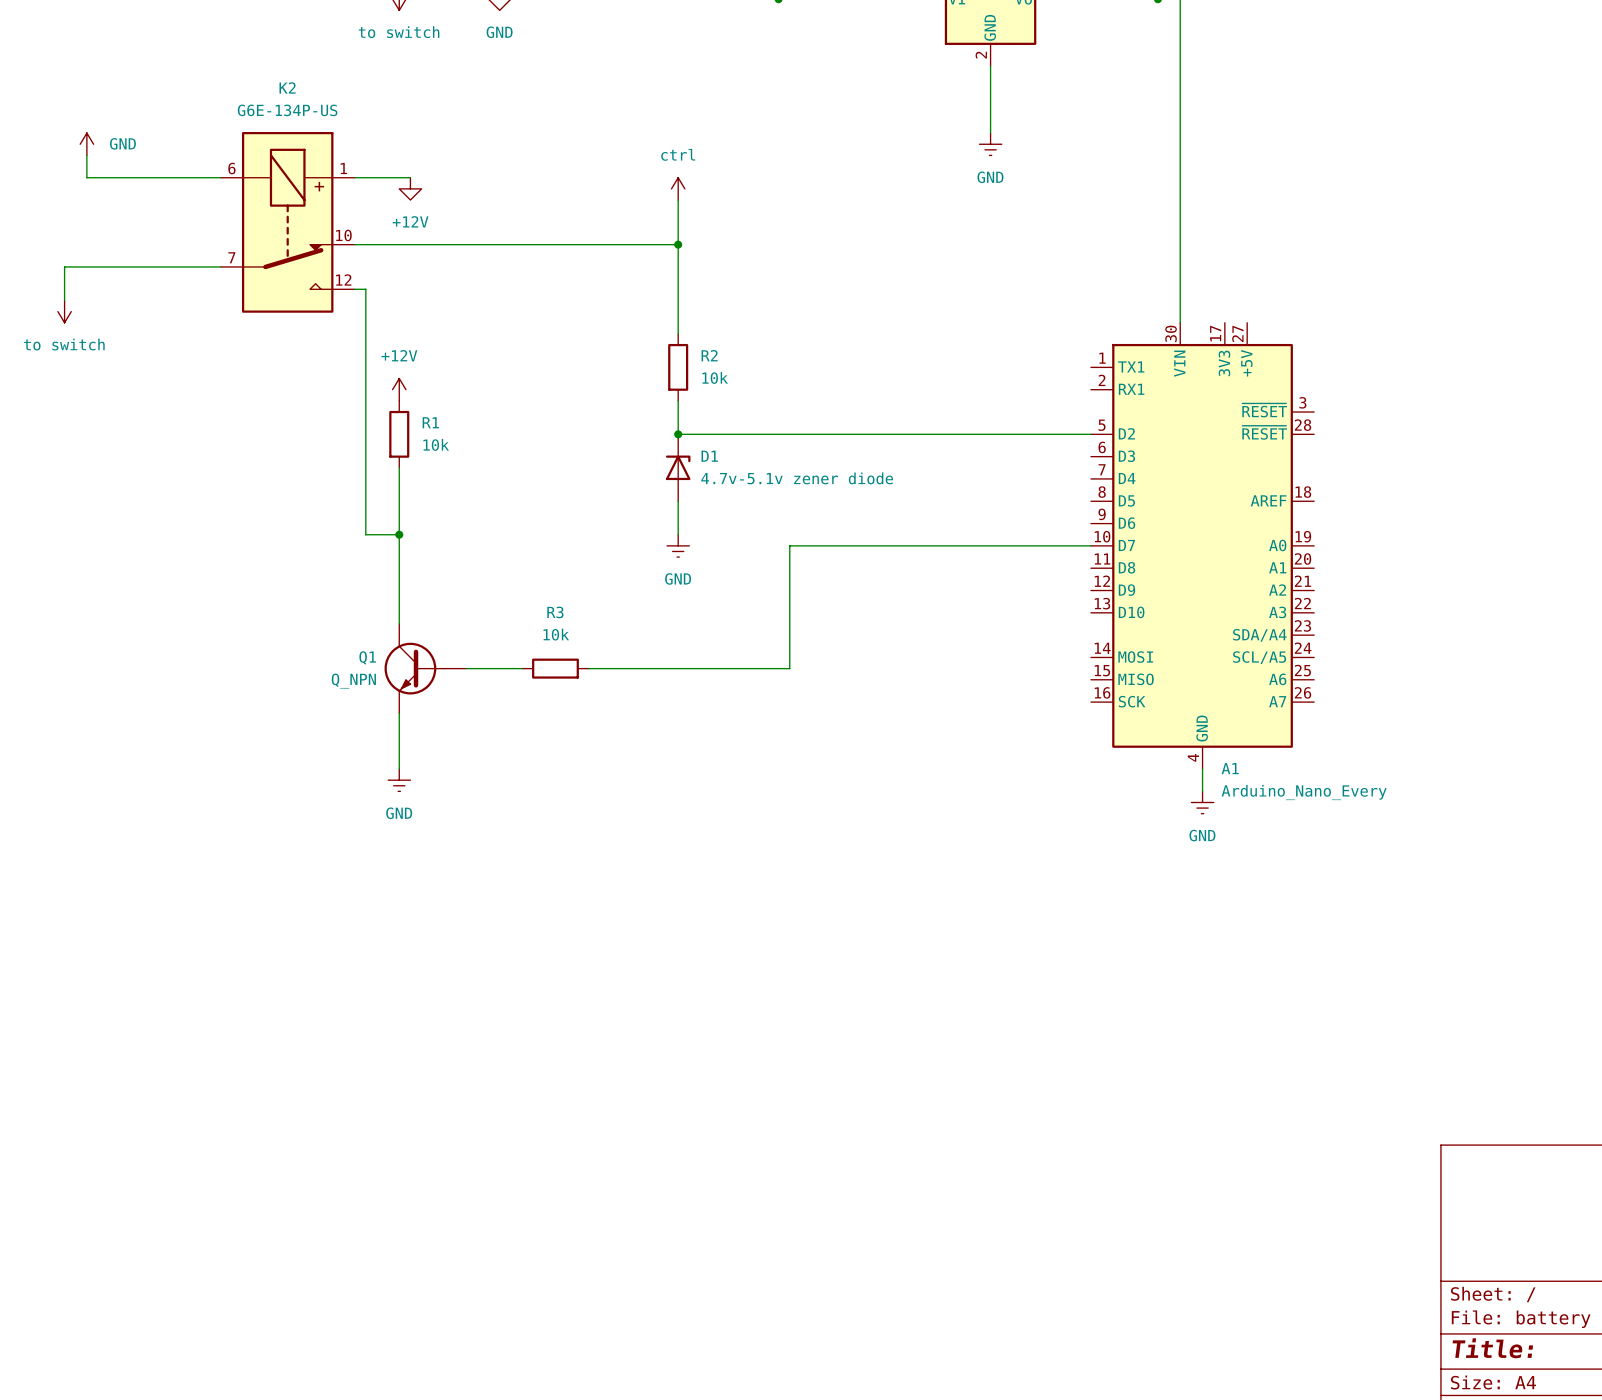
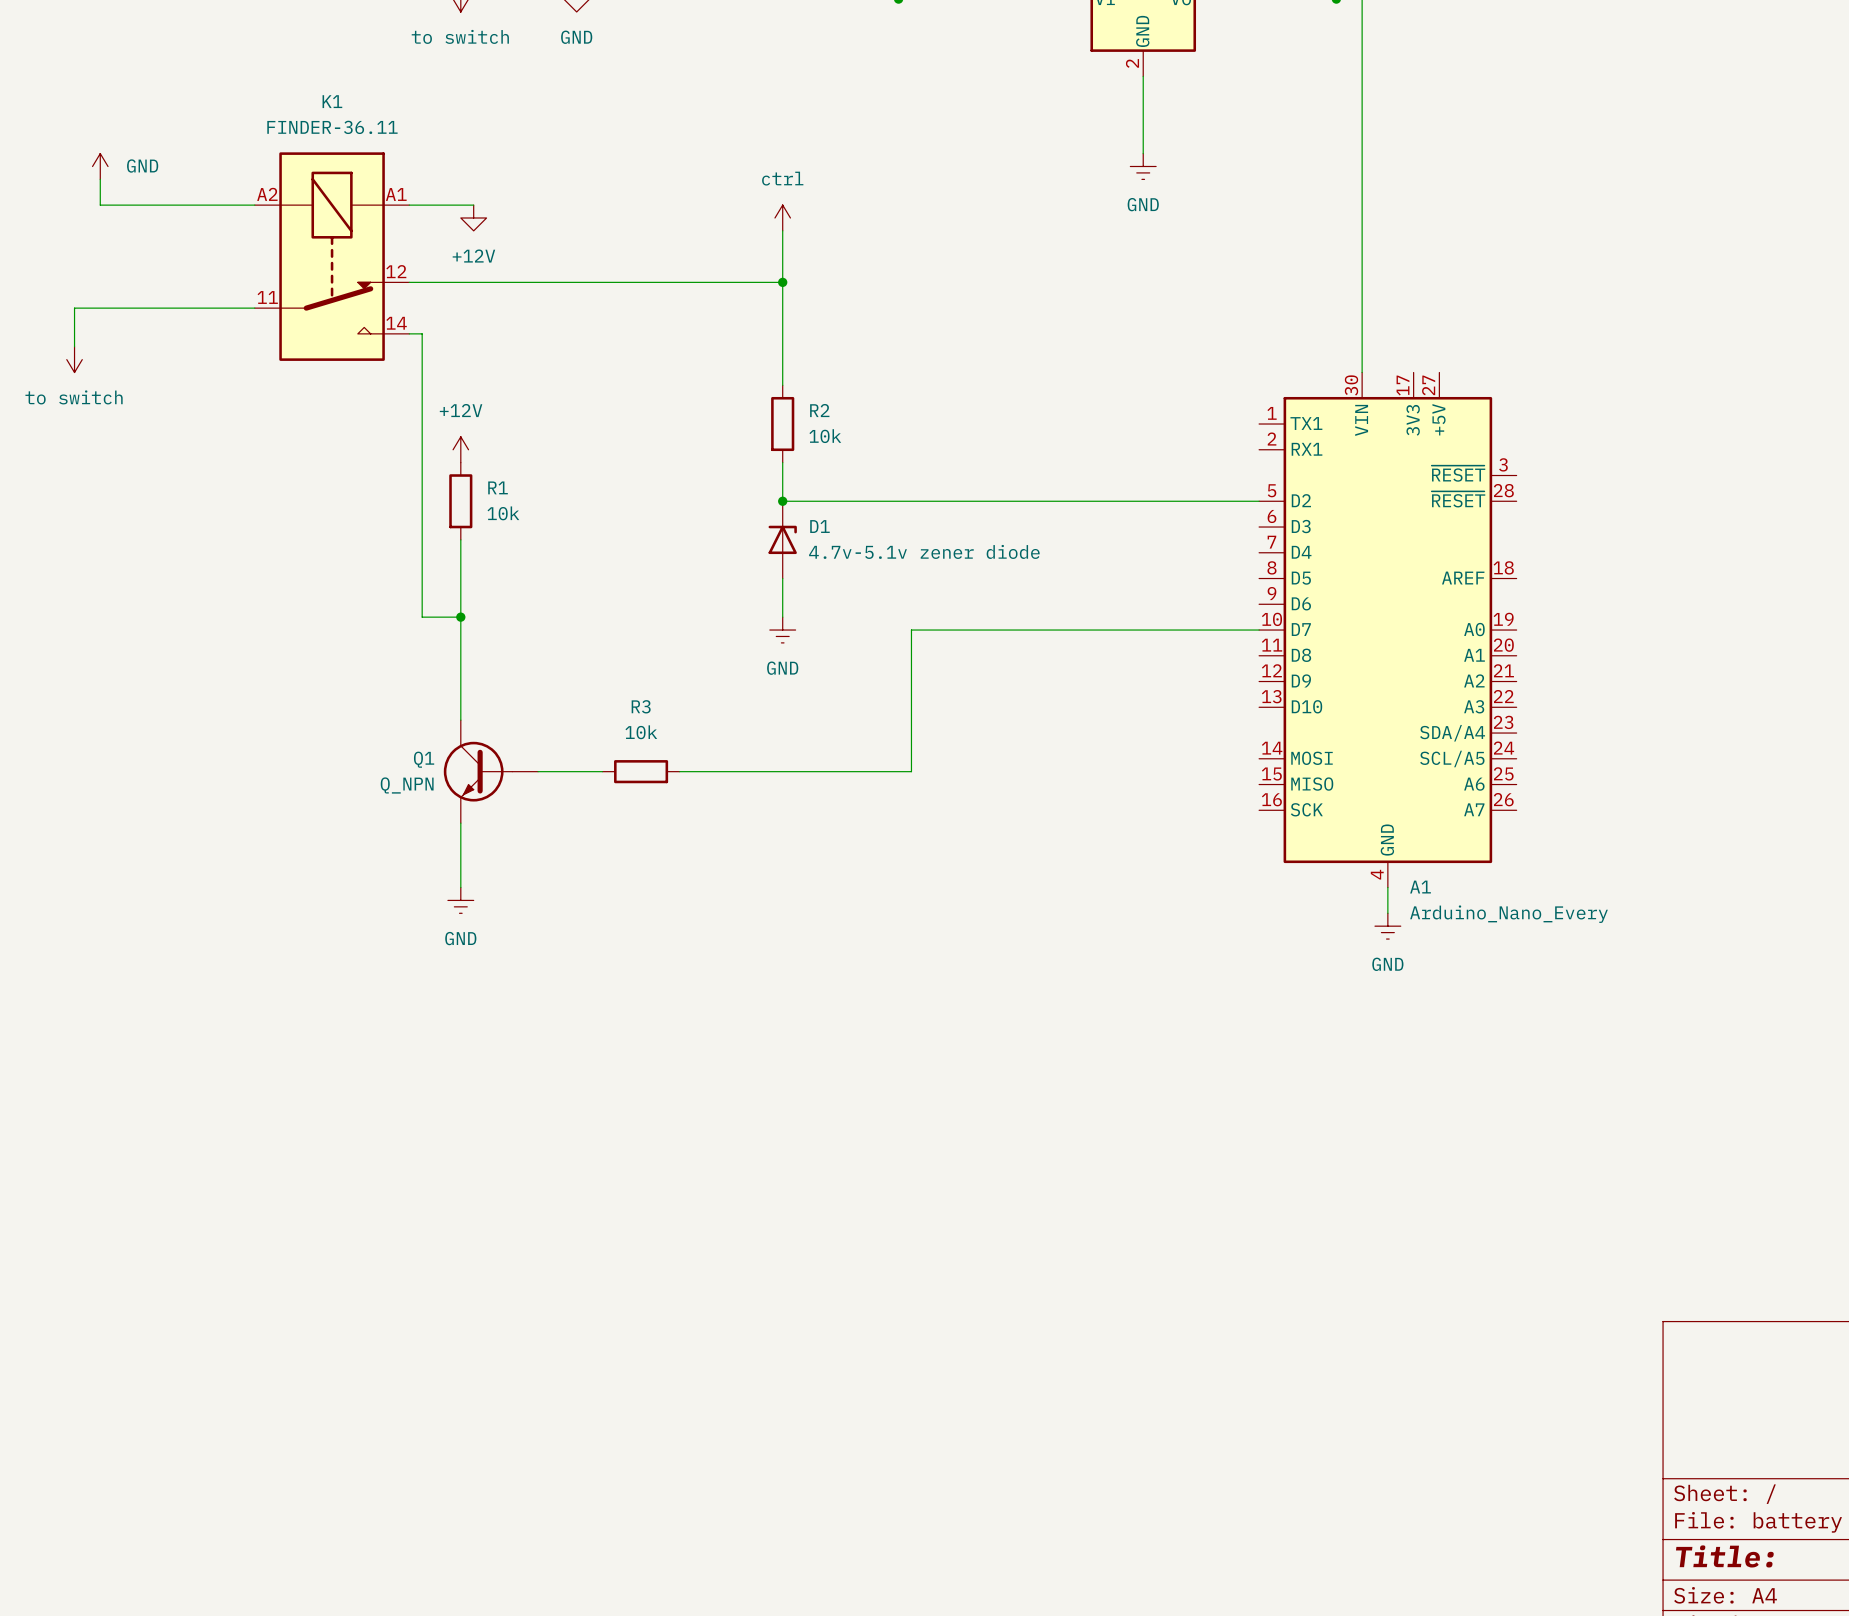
K2: G6E-134P-US (287, 222) -> none
K1: none -> FINDER-36.11 (332, 256)

